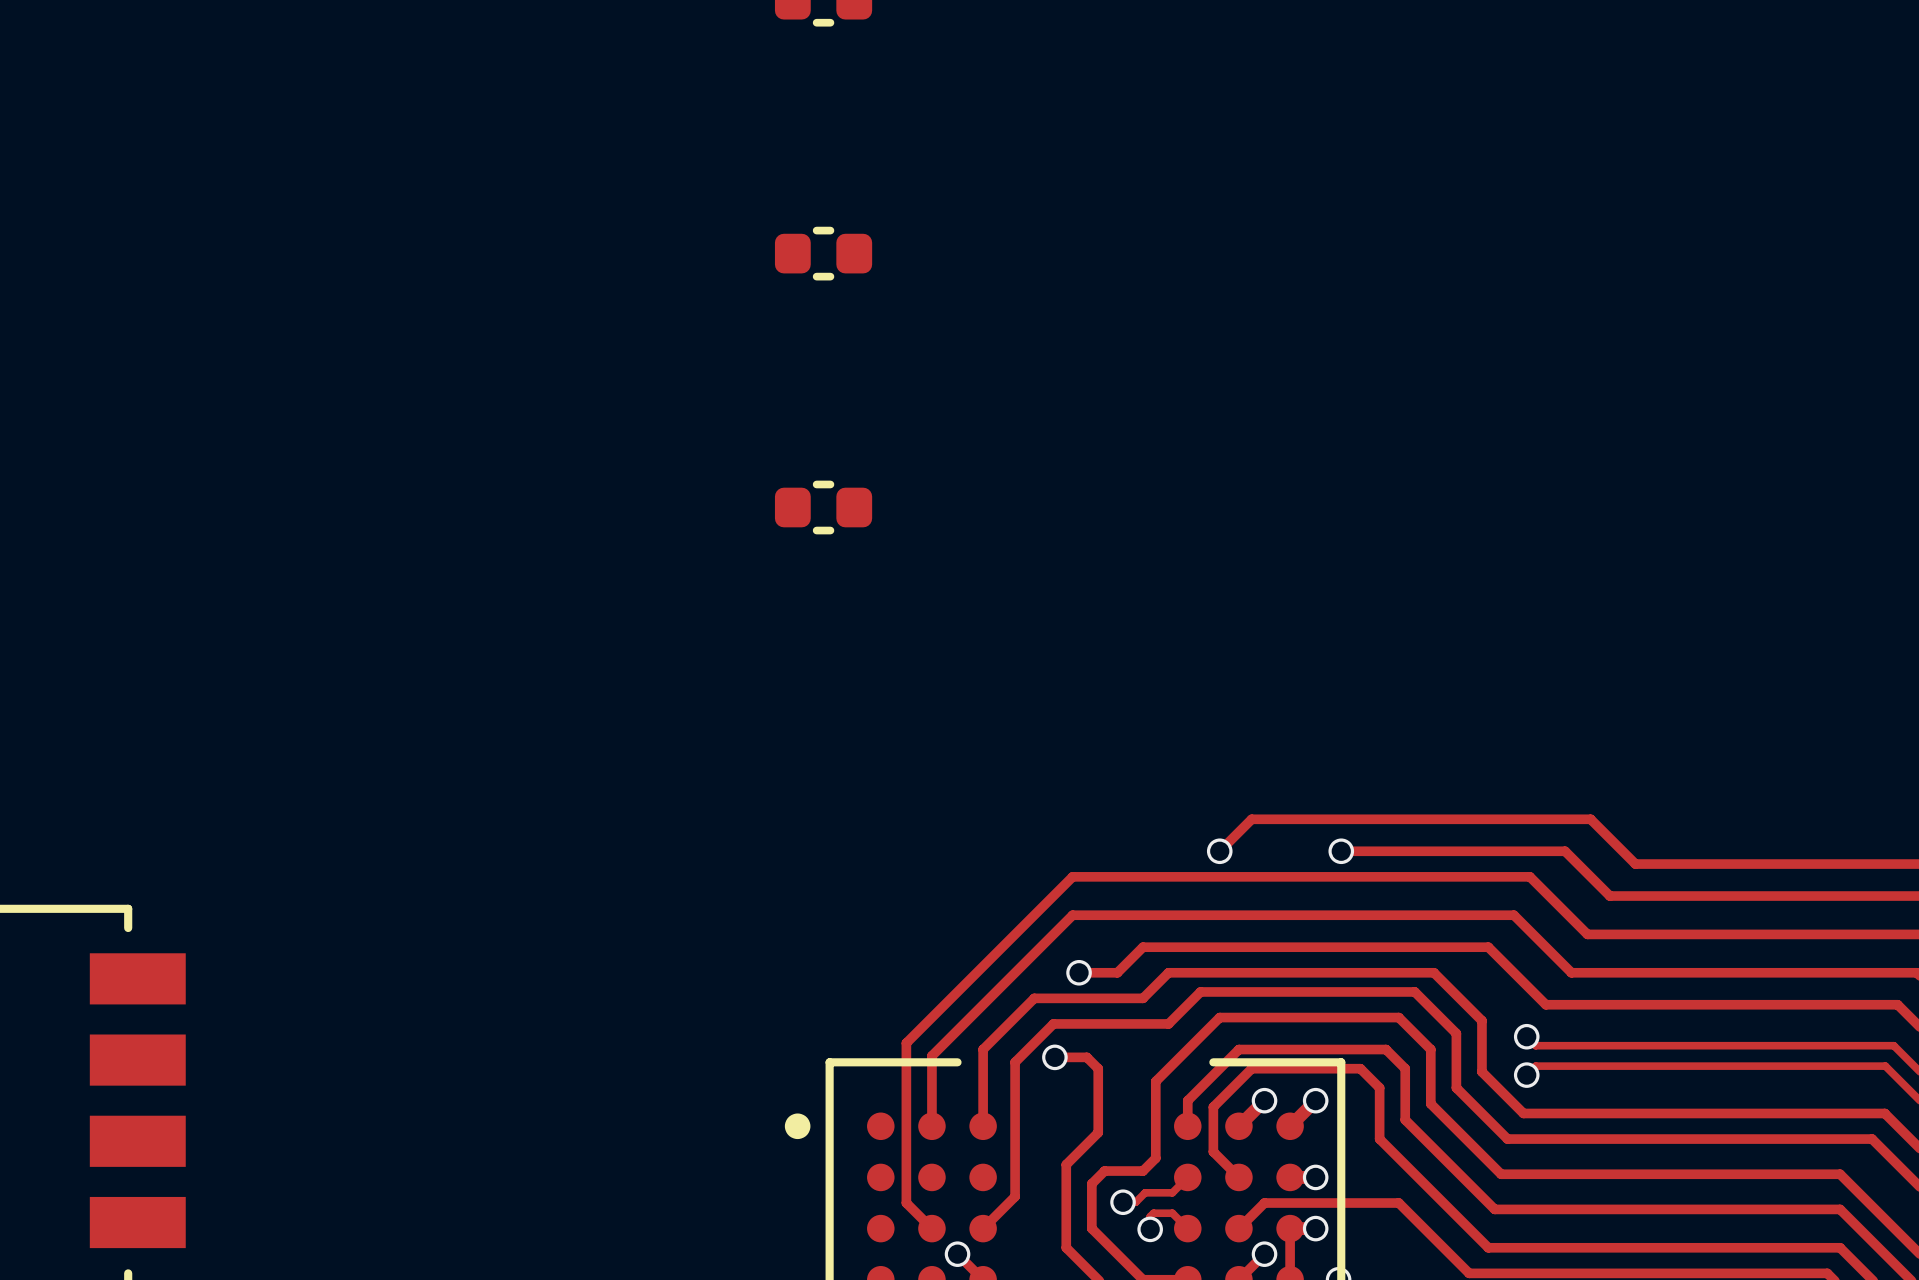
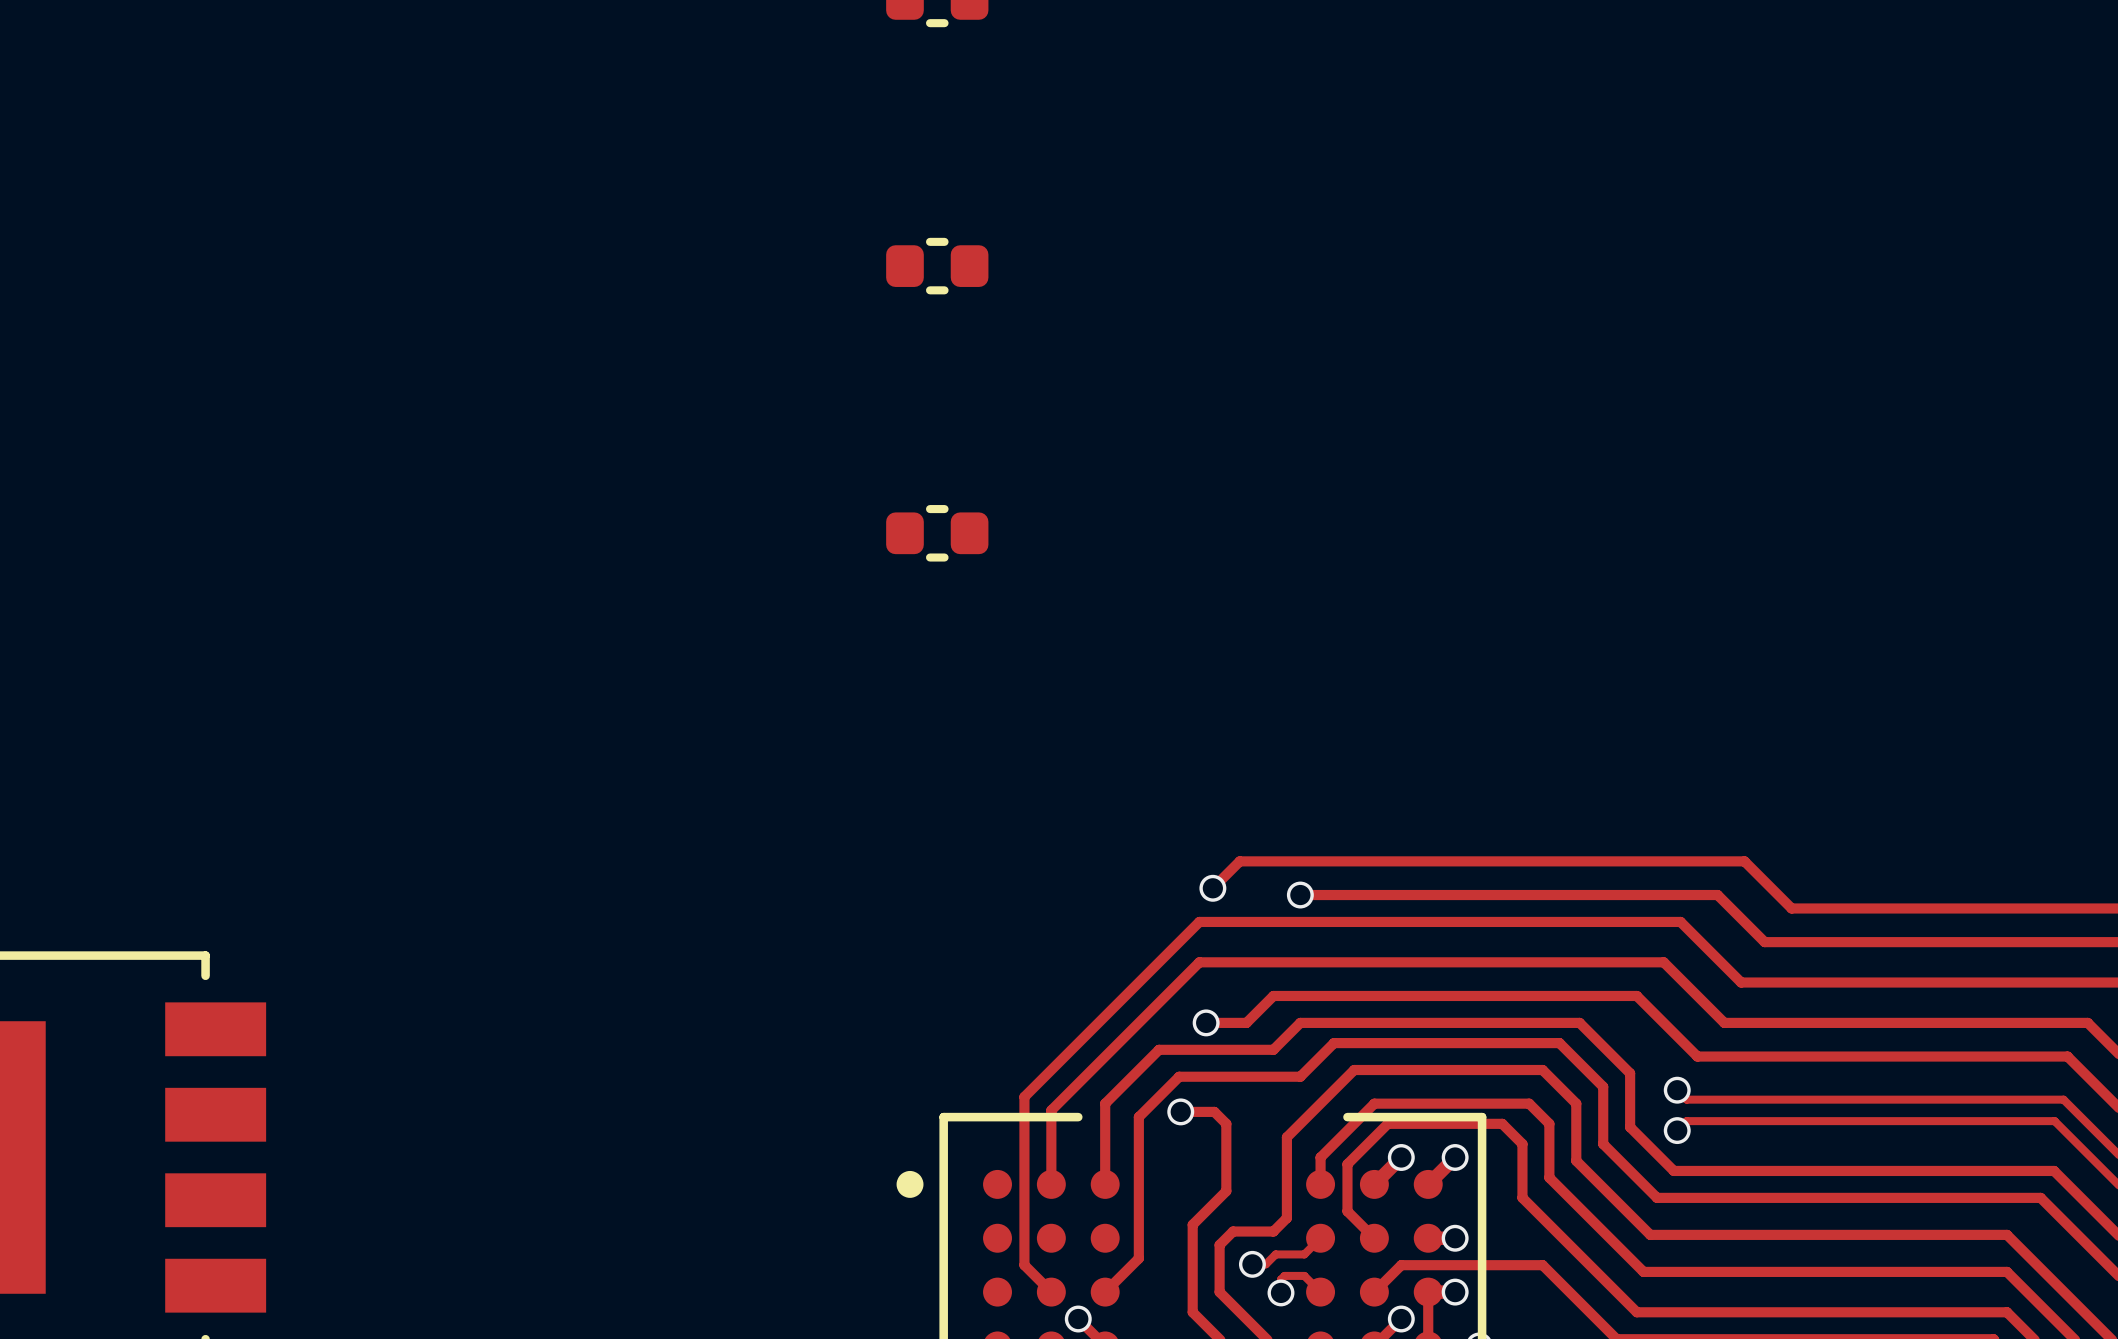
track: (1251, 819) (1219, 851) -> (1387, 861) (1239, 861) (1212, 888)
via: none -> (1212, 888)
track: none -> (1300, 895) (1482, 895)
via position: (1219, 851) -> (1300, 895)
via: (1341, 851) -> none

